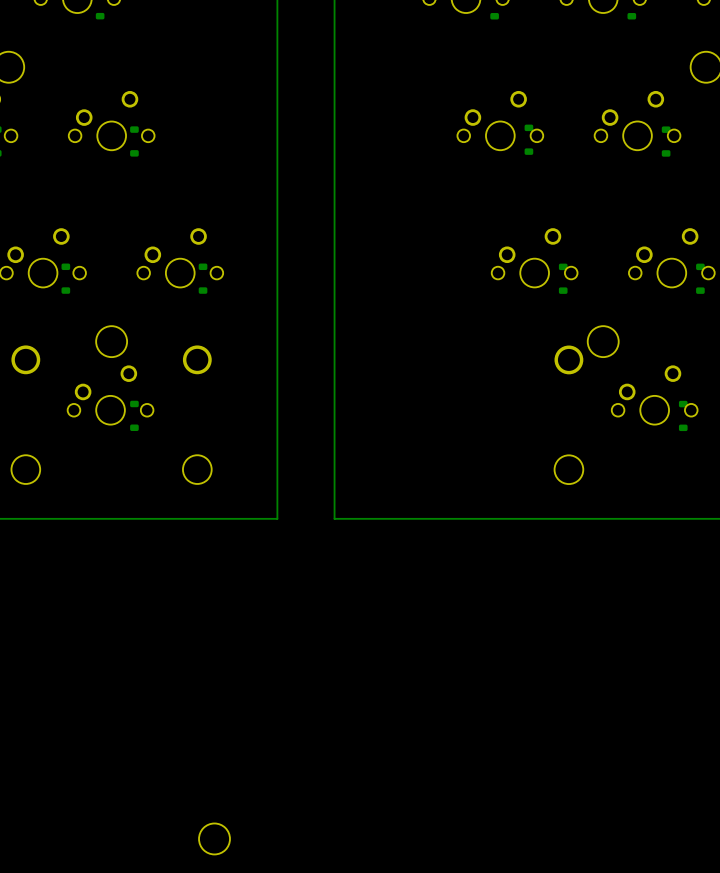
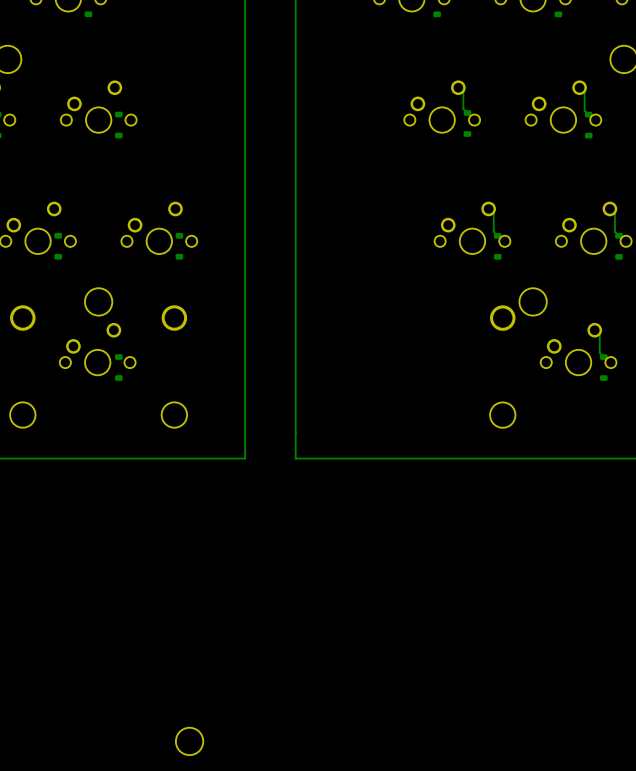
bottom track: none -> (463, 87) (463, 108) (467, 112)
bottom track: none -> (584, 87) (584, 110) (588, 114)
bottom track: none -> (493, 208) (493, 231) (497, 235)
bottom track: none -> (614, 208) (614, 231) (618, 235)
bottom track: none -> (599, 330) (599, 353) (603, 357)

